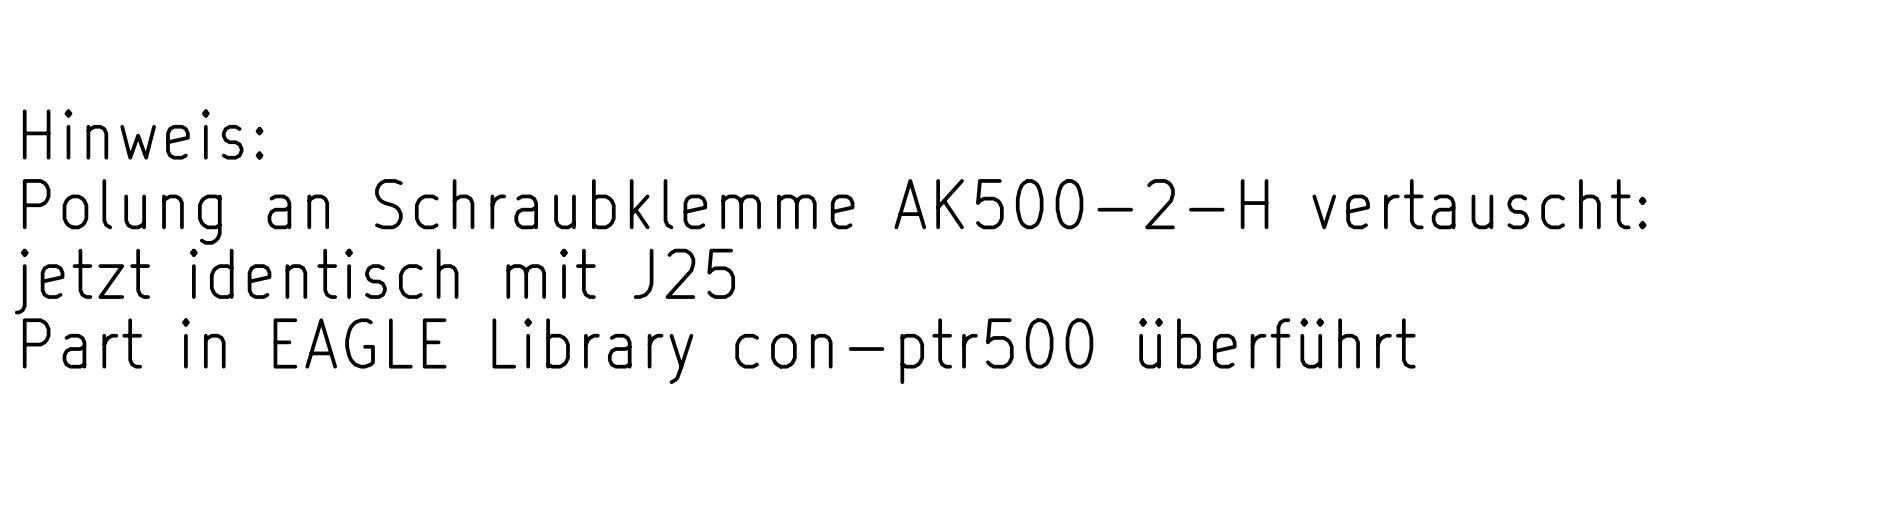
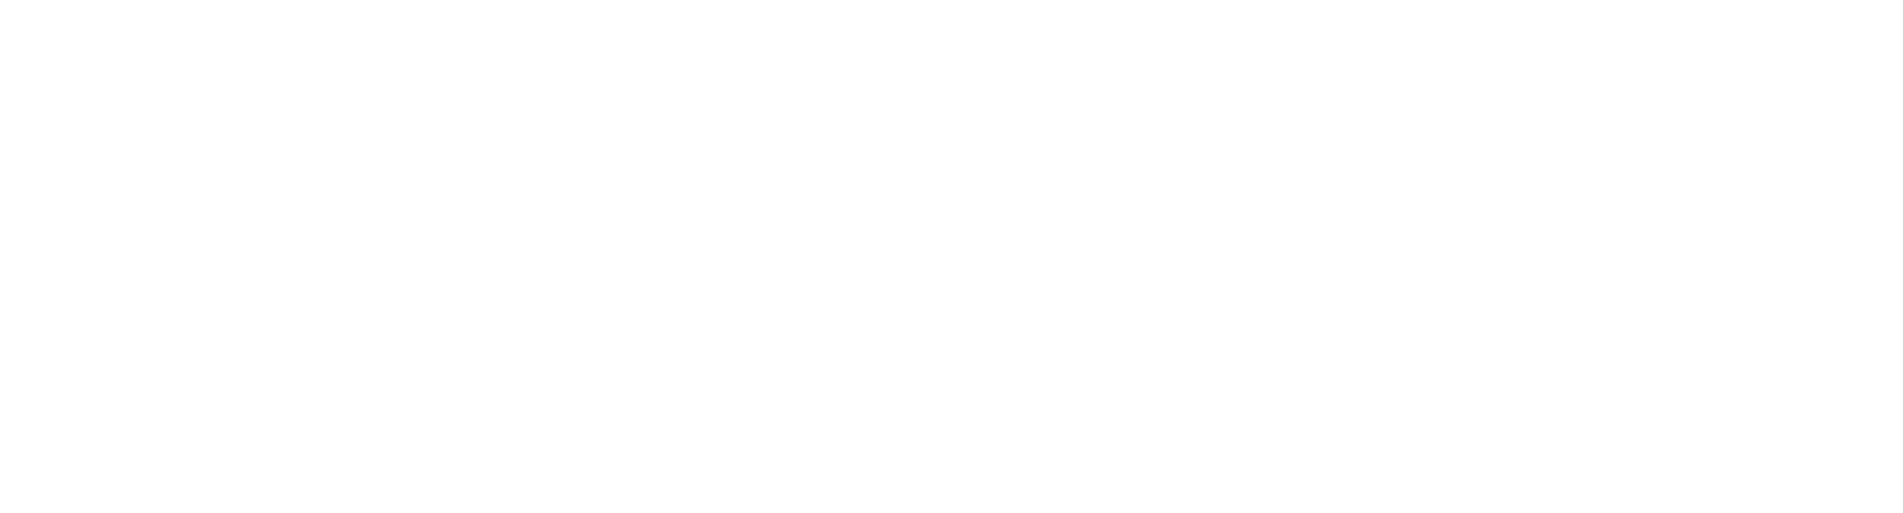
text: Hinweis: (143, 134) -> none
text: Polung an Schraubklemme AK500-2-H vertauscht: (834, 211) -> none
text: jetzt identisch mit J25 (374, 281) -> none
text: Part in EAGLE Library con-ptr500 überführt (719, 351) -> none

